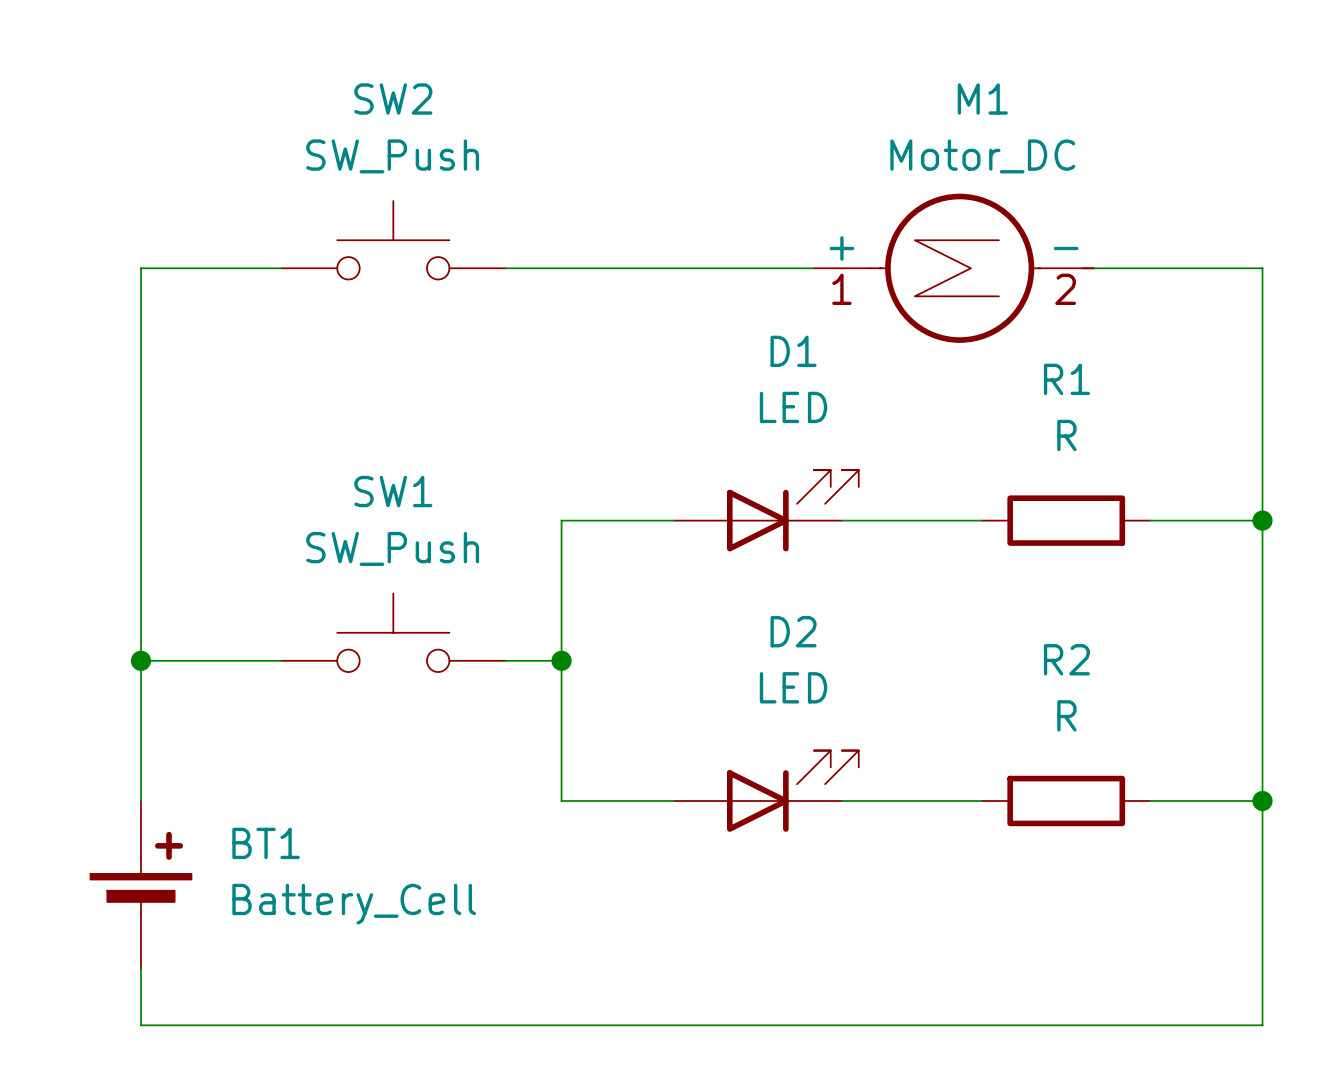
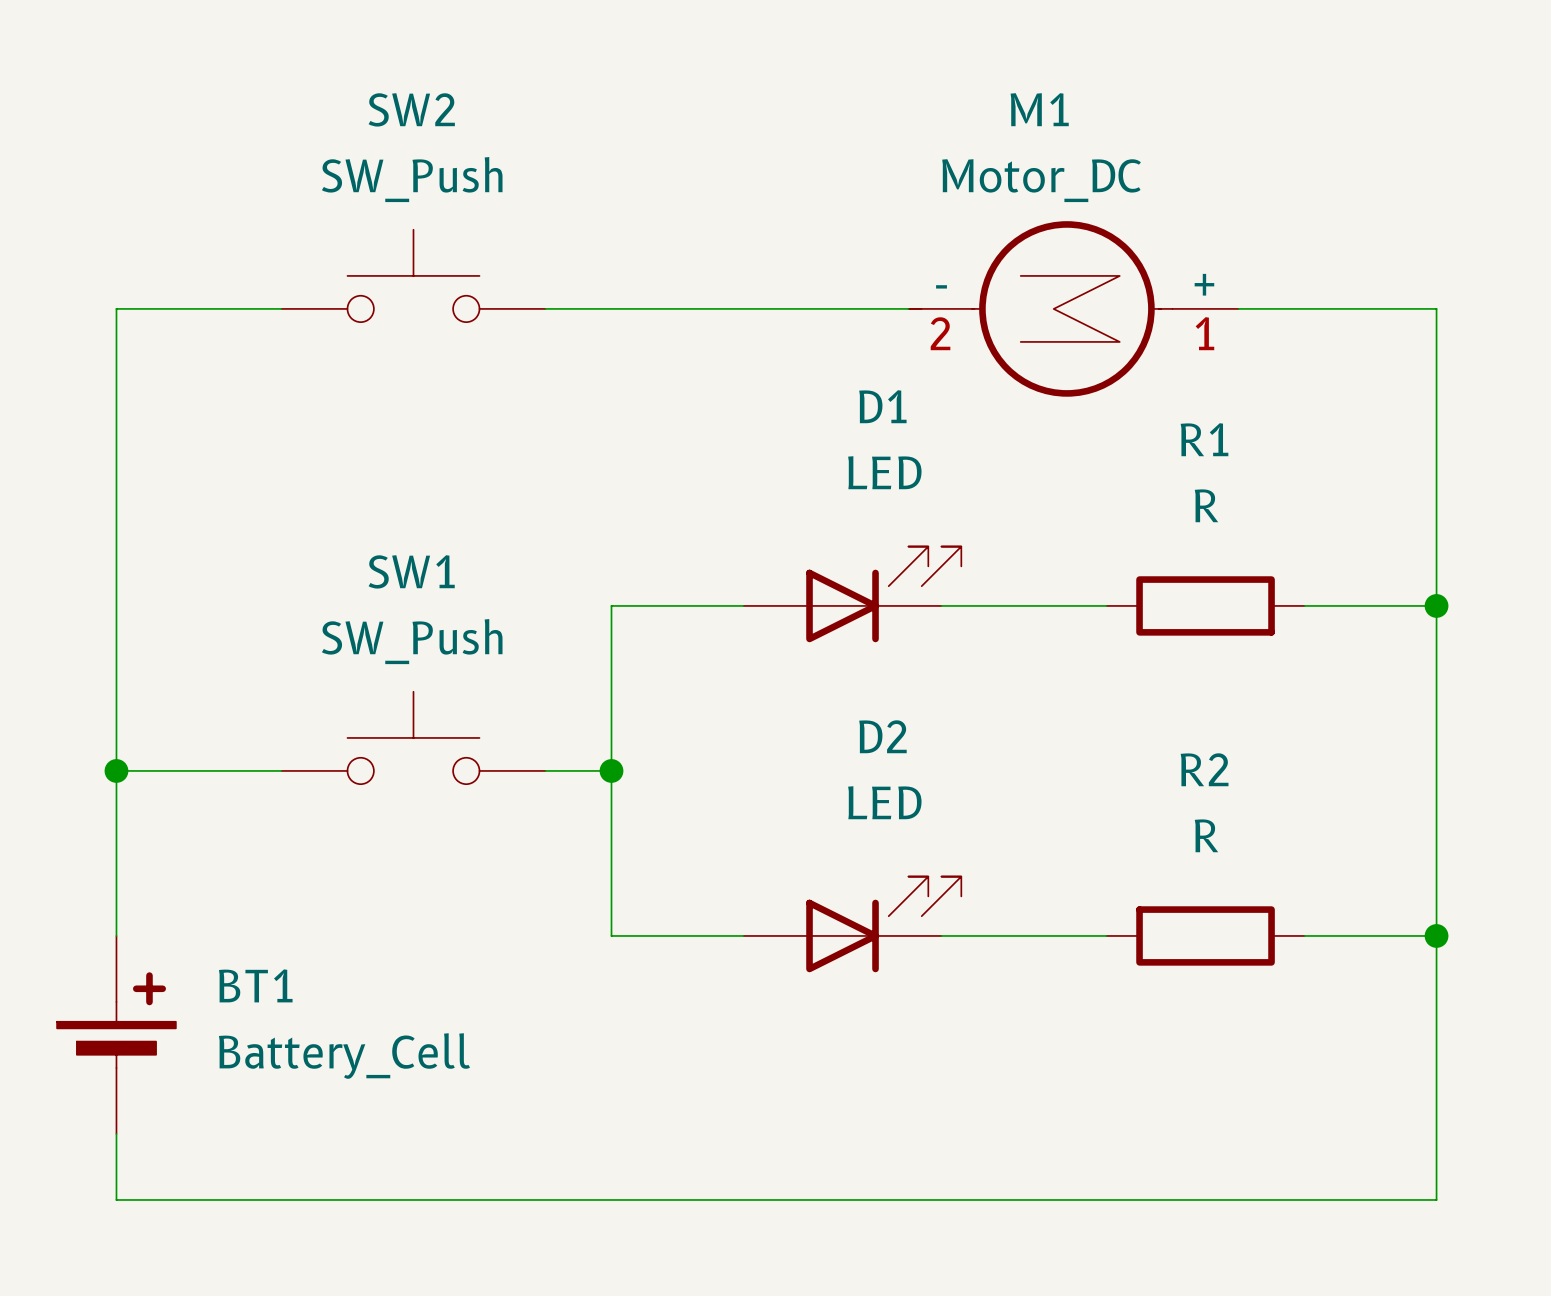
M1 name position: M1 (982, 99) -> M1 (1039, 109)
M1 value position: Motor_DC (982, 156) -> Motor_DC (1041, 180)
M1 rotation: 0° (982, 268) -> 180° (1040, 308)

